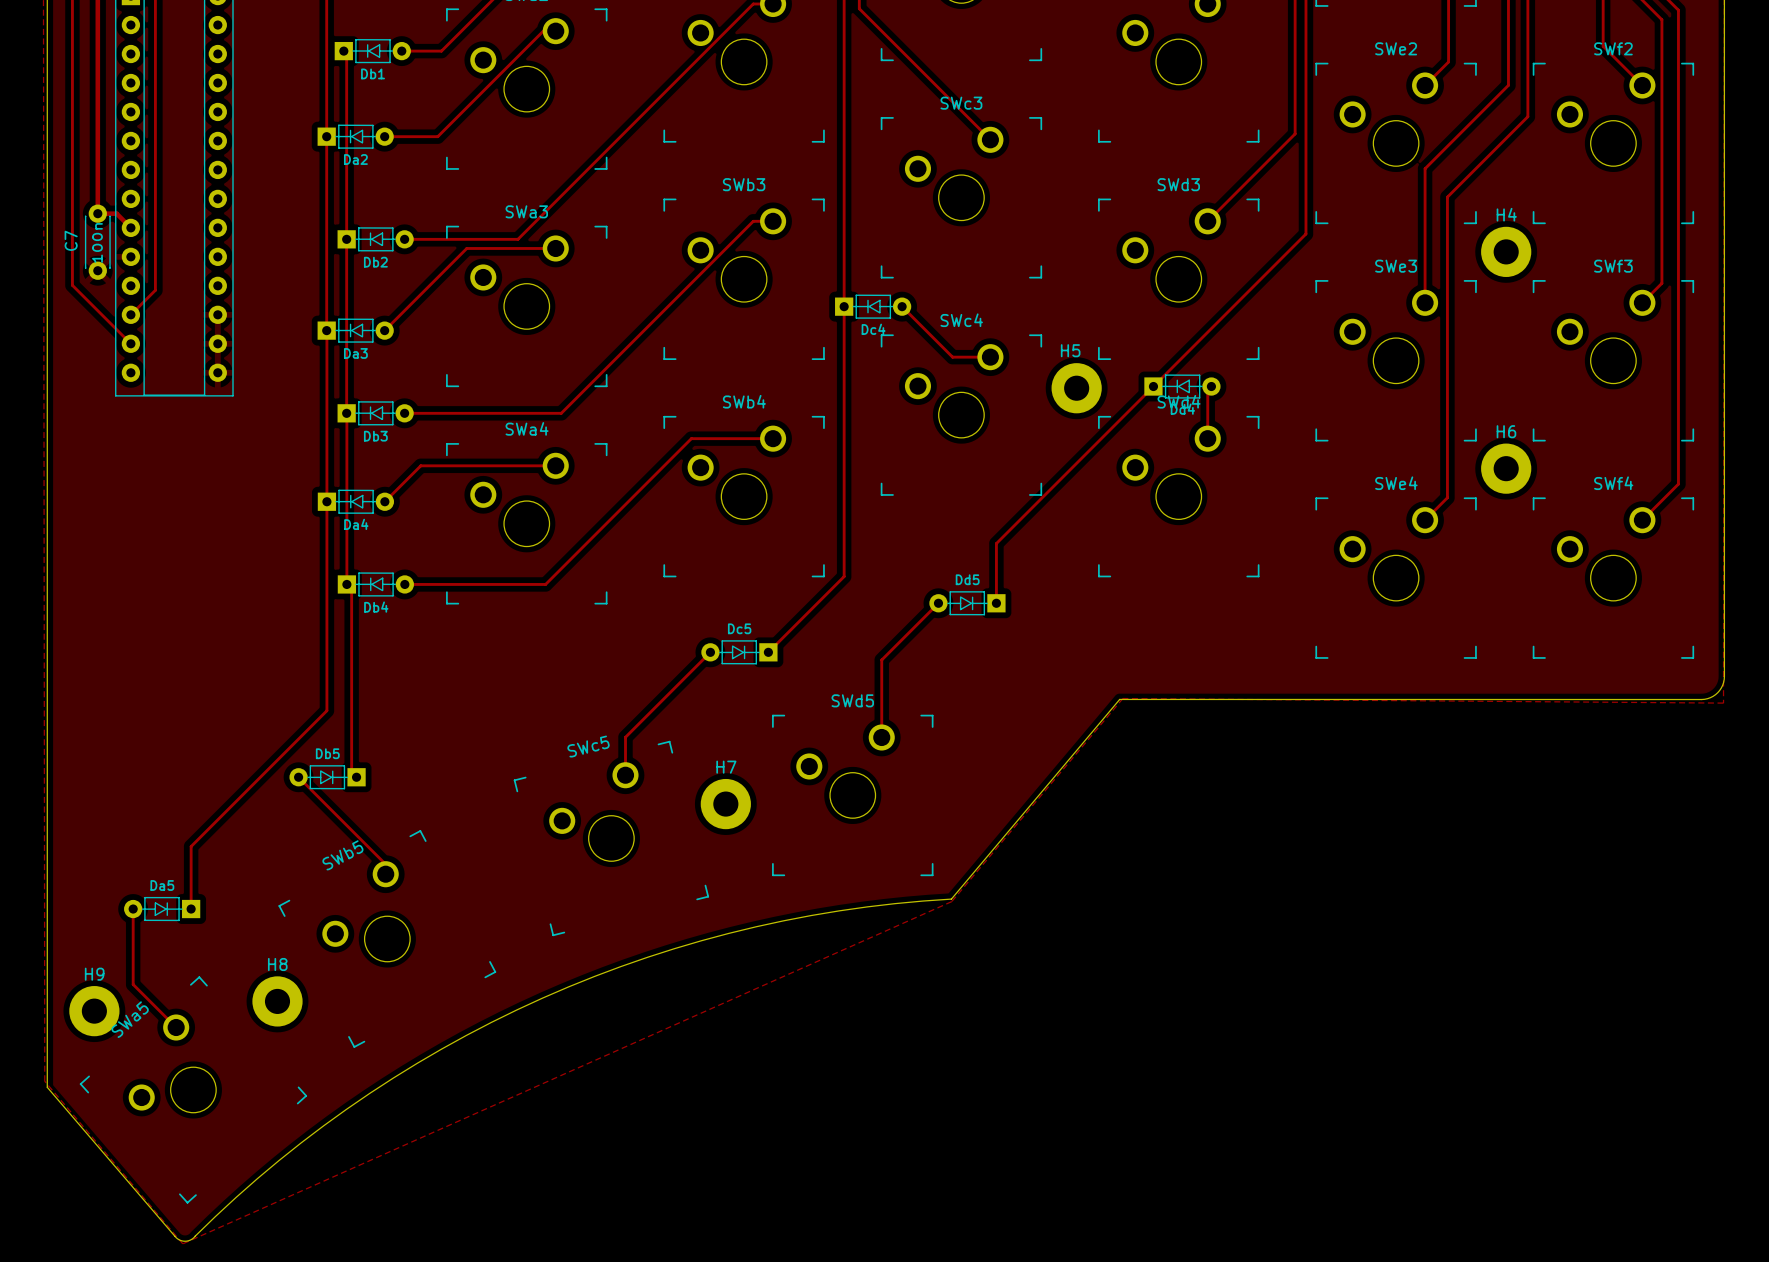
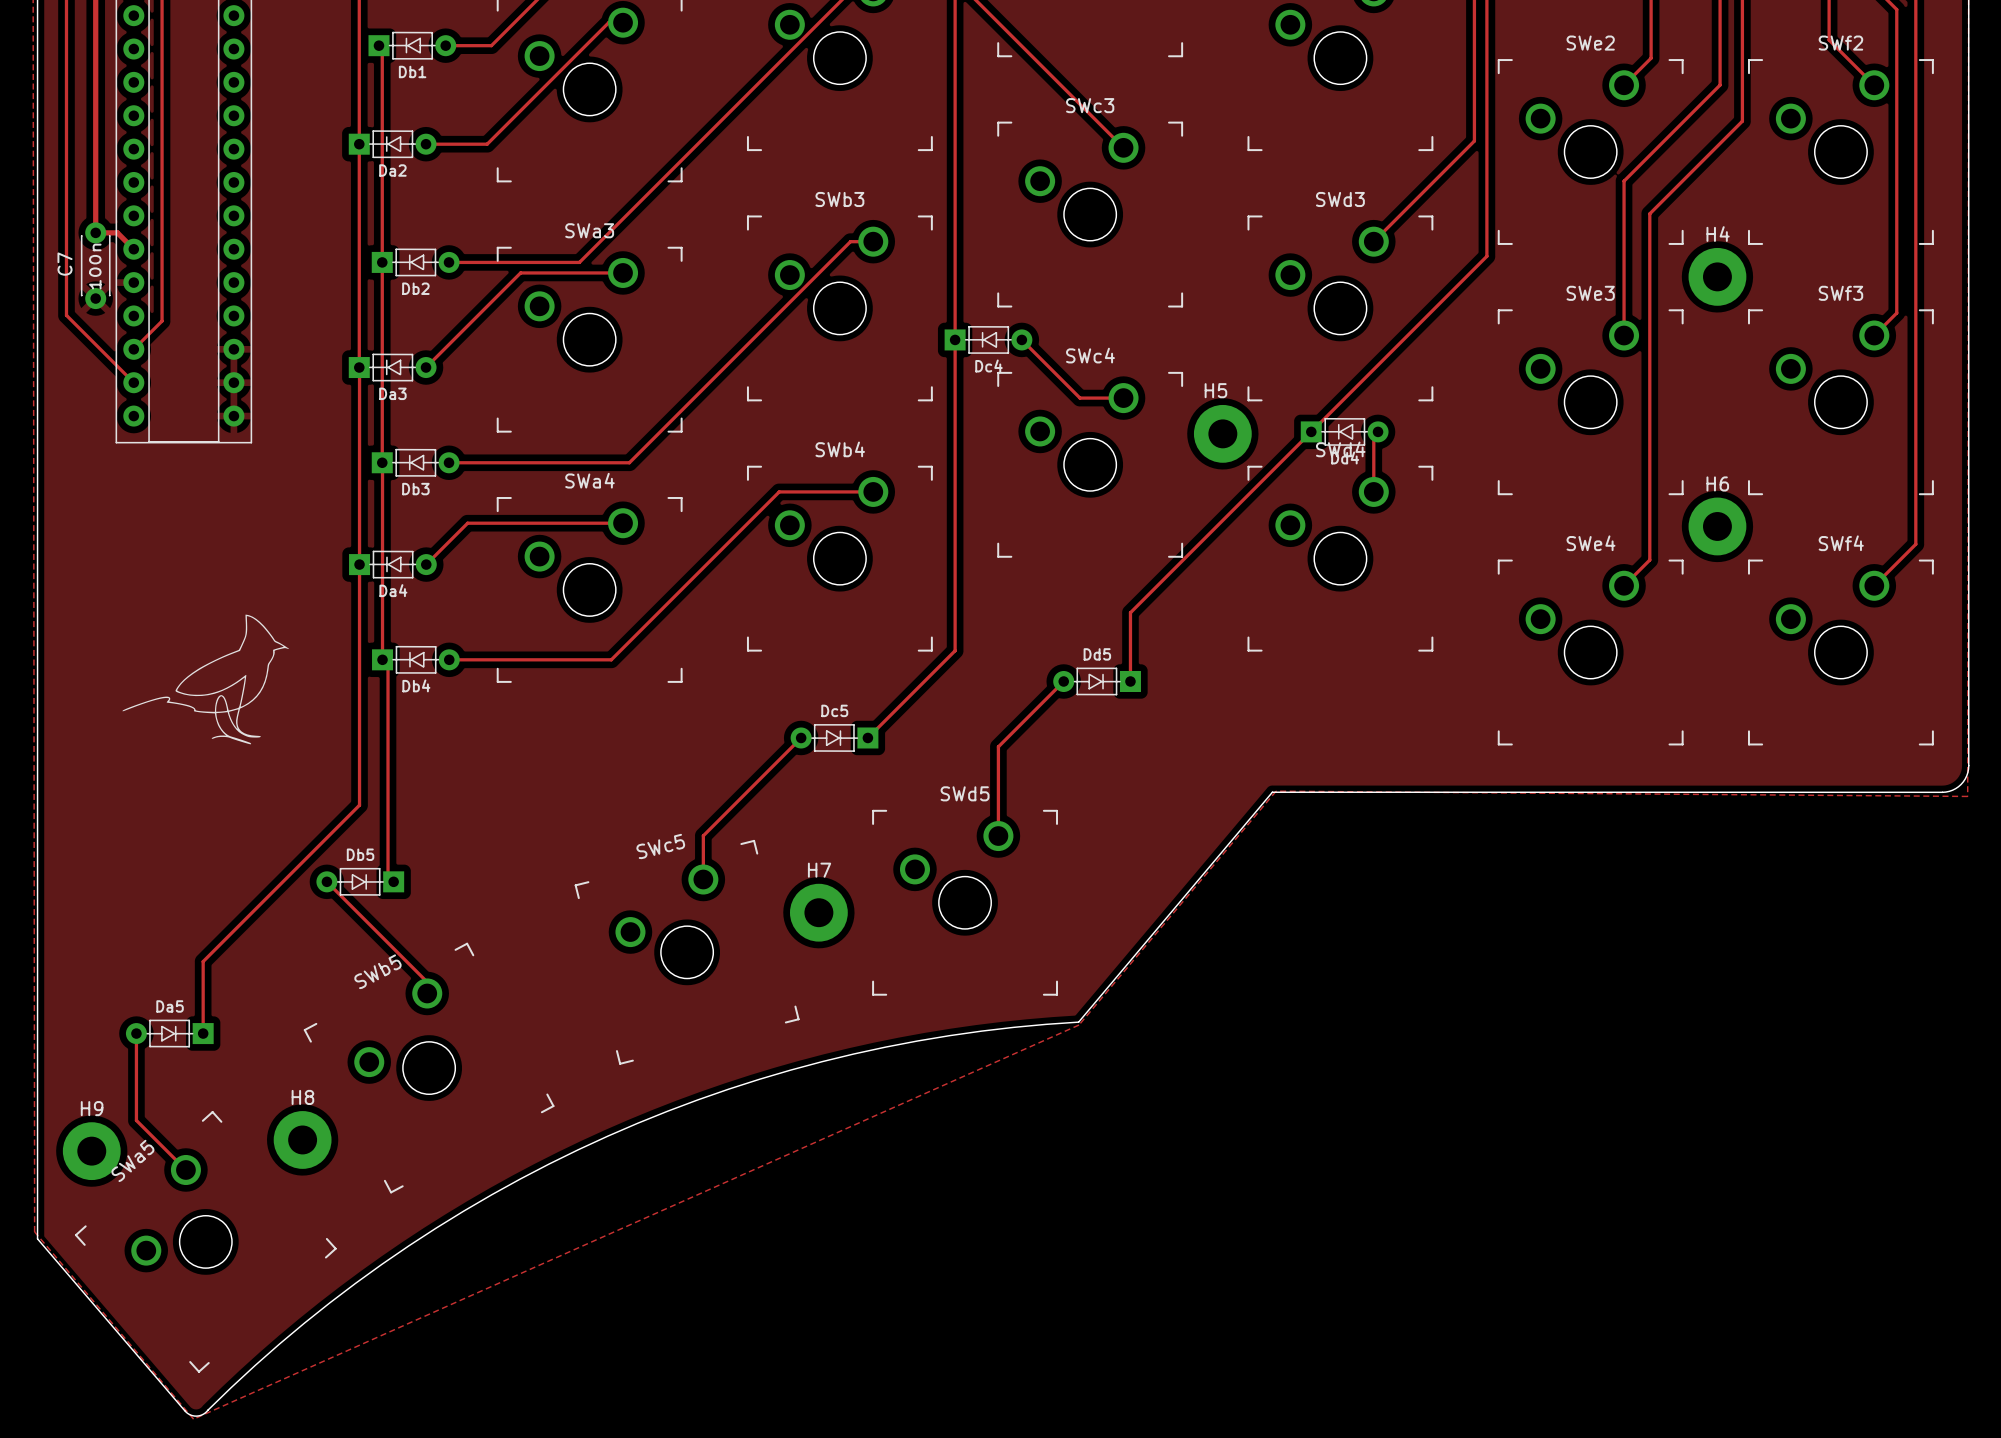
drawing: none -> [122, 614, 290, 745]

